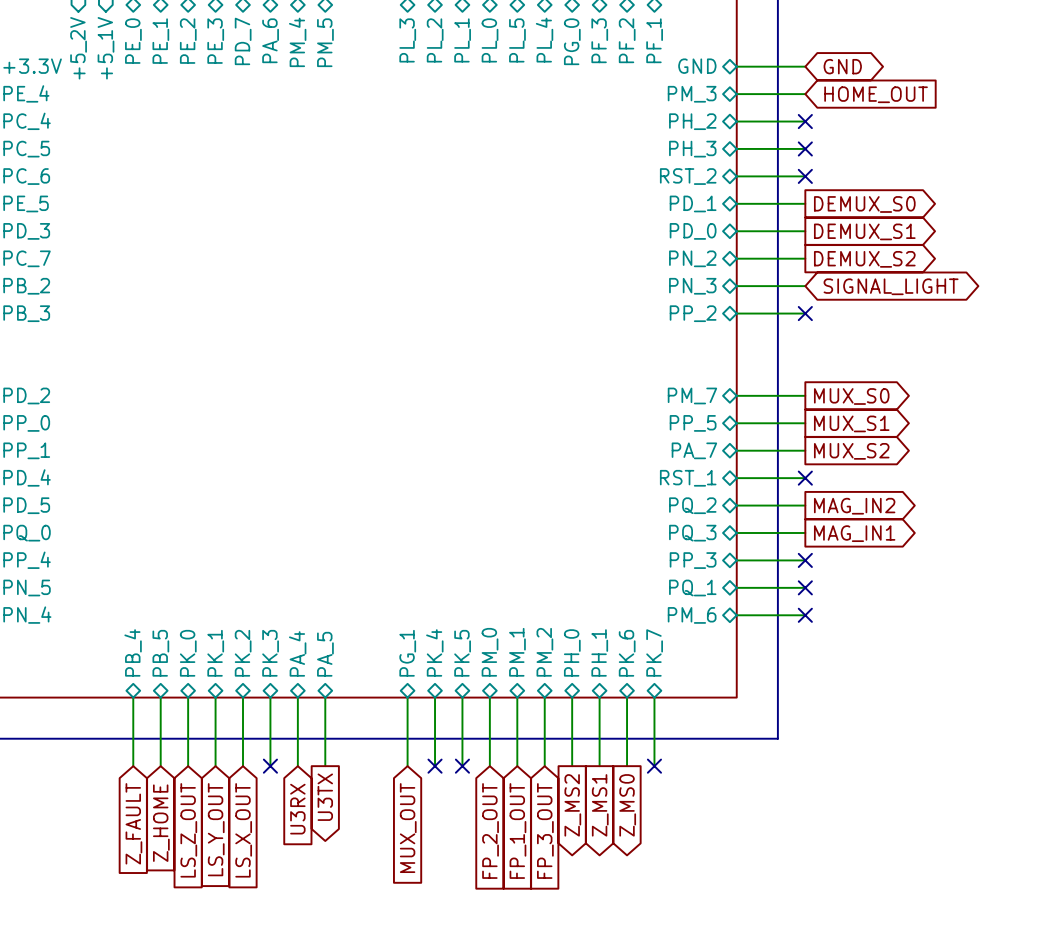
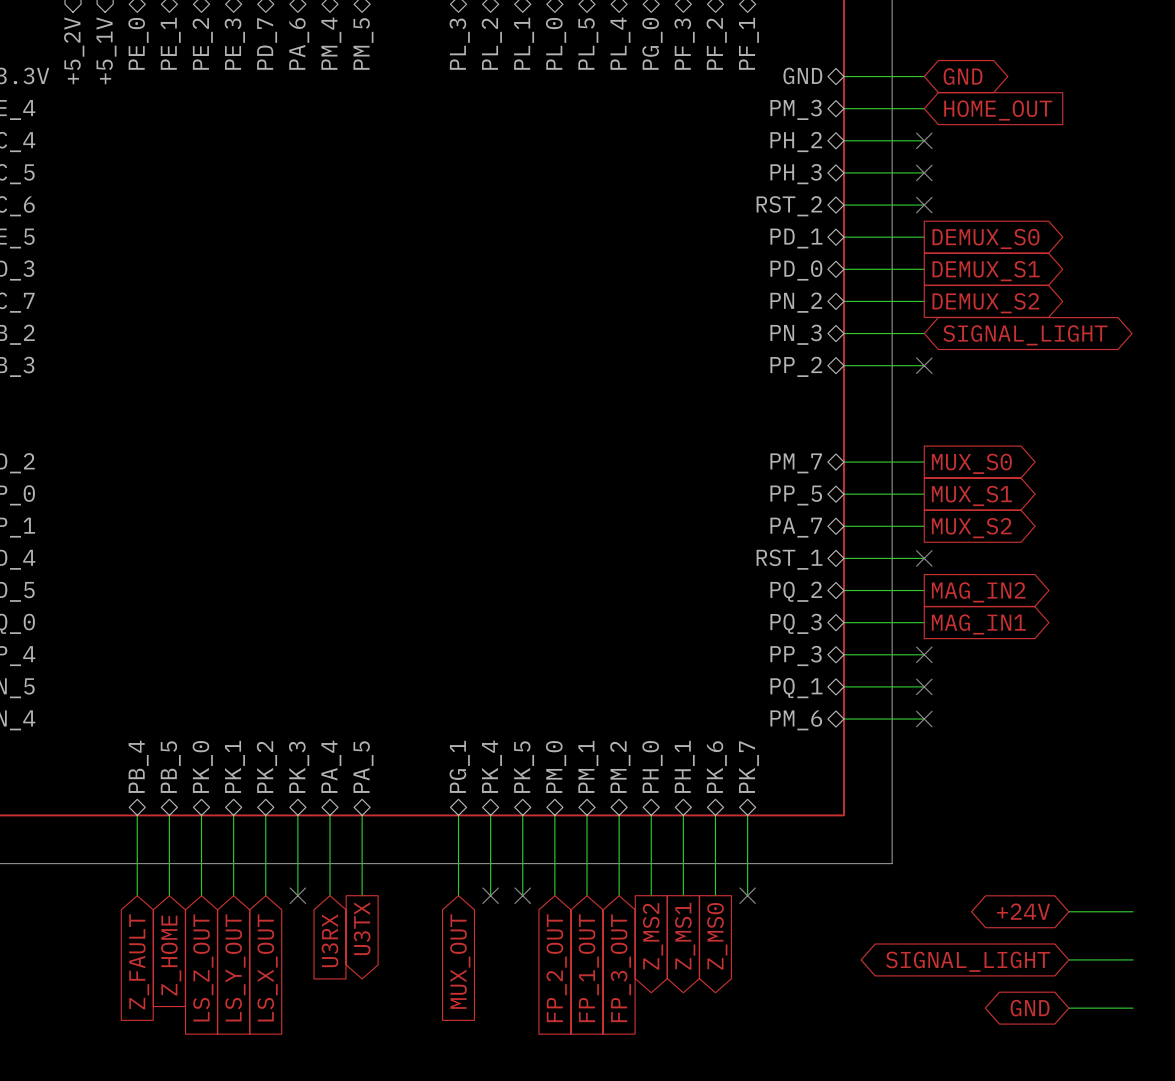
global label: none -> +24V (1023, 911)
wire: none -> (1068, 911) (1133, 911)
global label: none -> SIGNAL_LIGHT (968, 961)
wire: none -> (1068, 959) (1133, 959)
global label: none -> GND (1030, 1008)
wire: none -> (1068, 1008) (1133, 1008)

